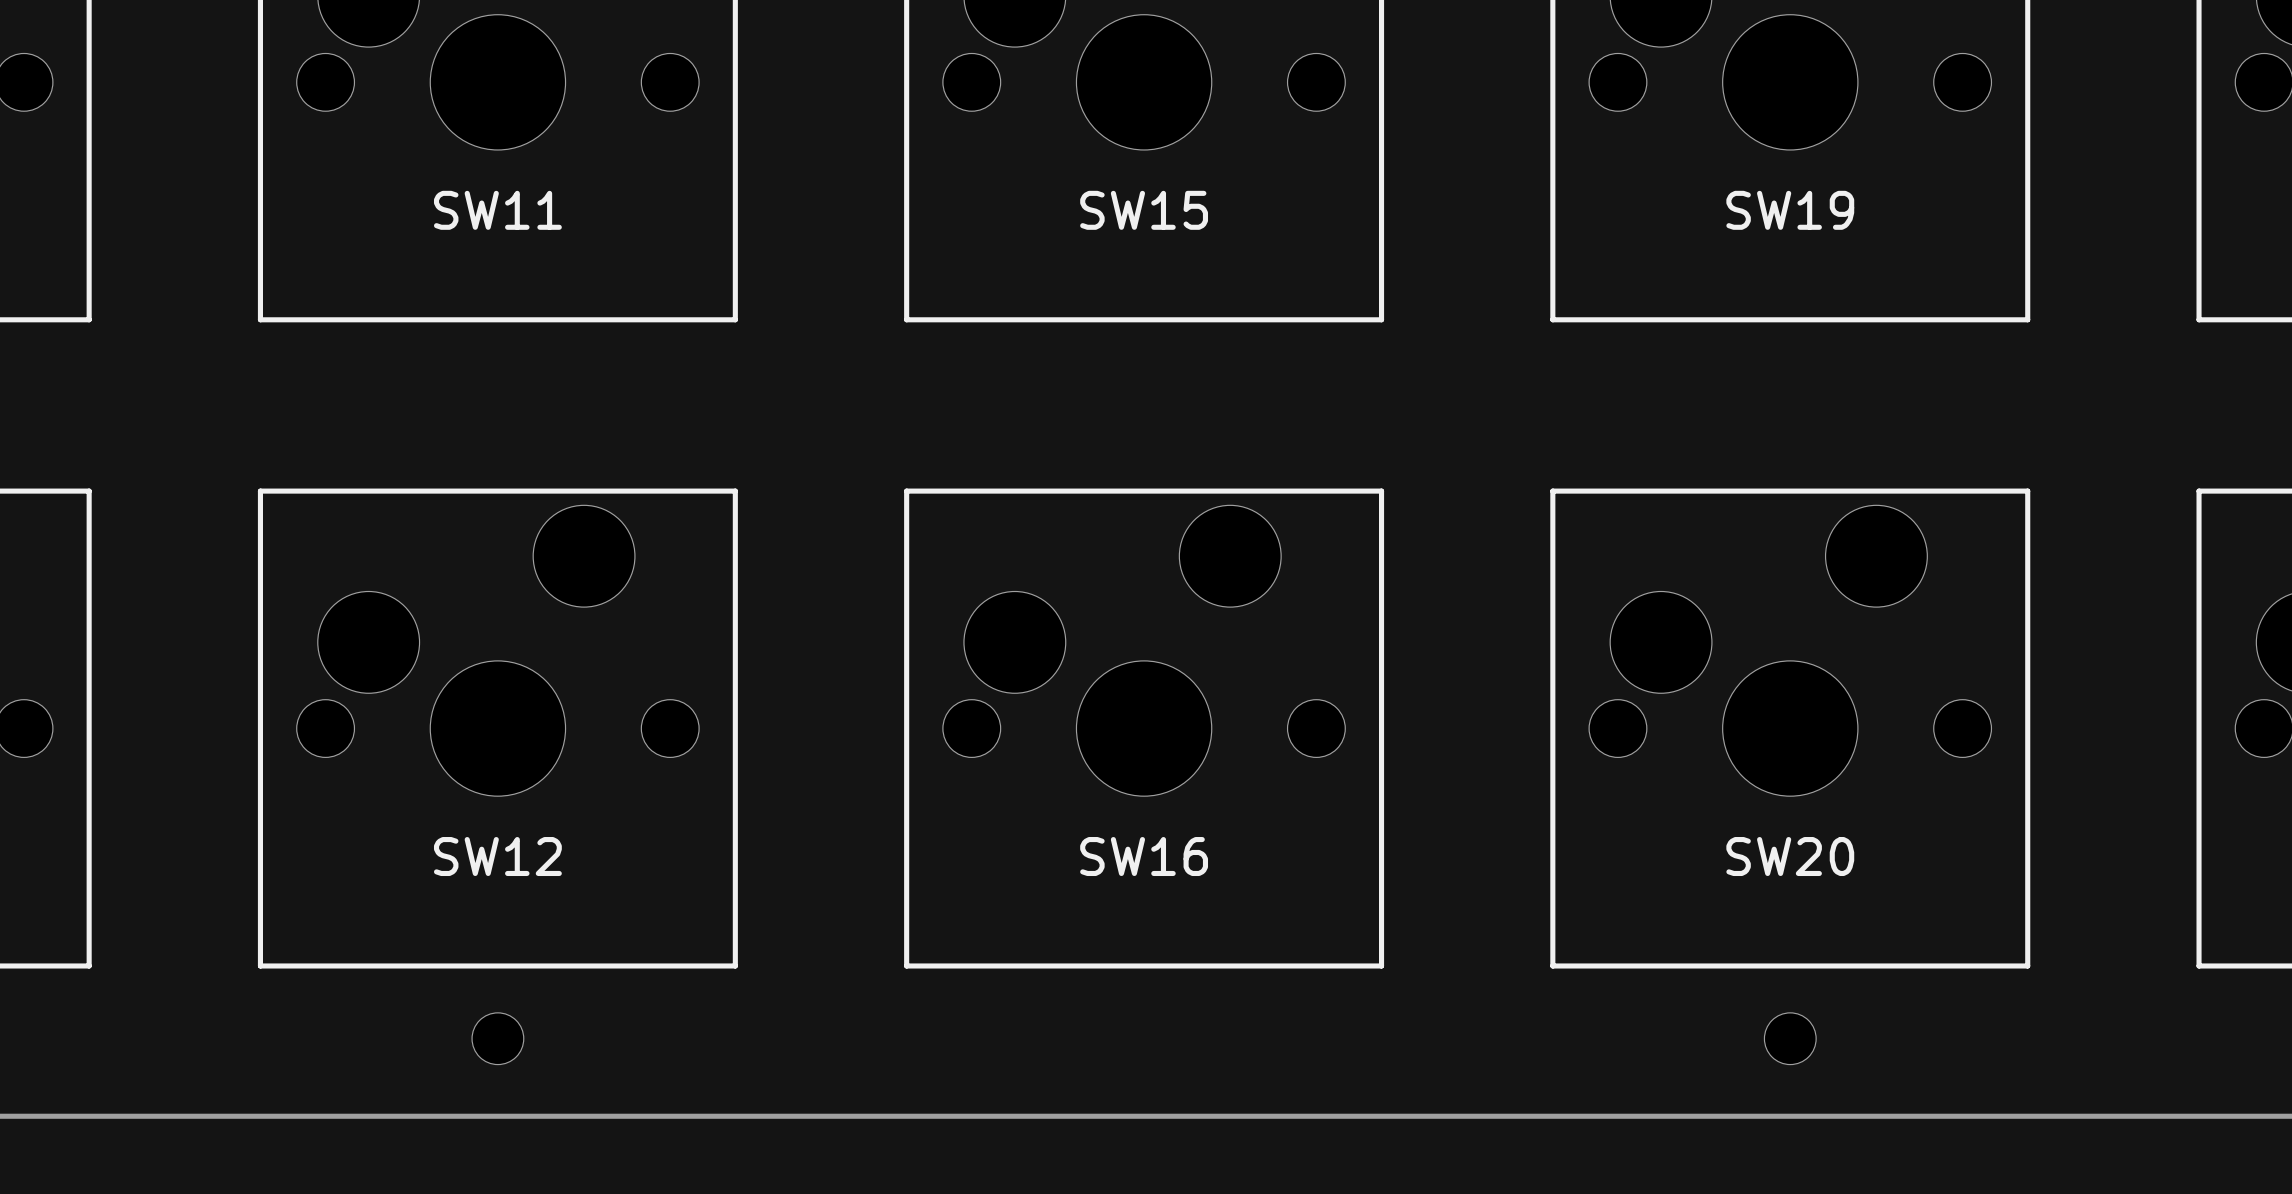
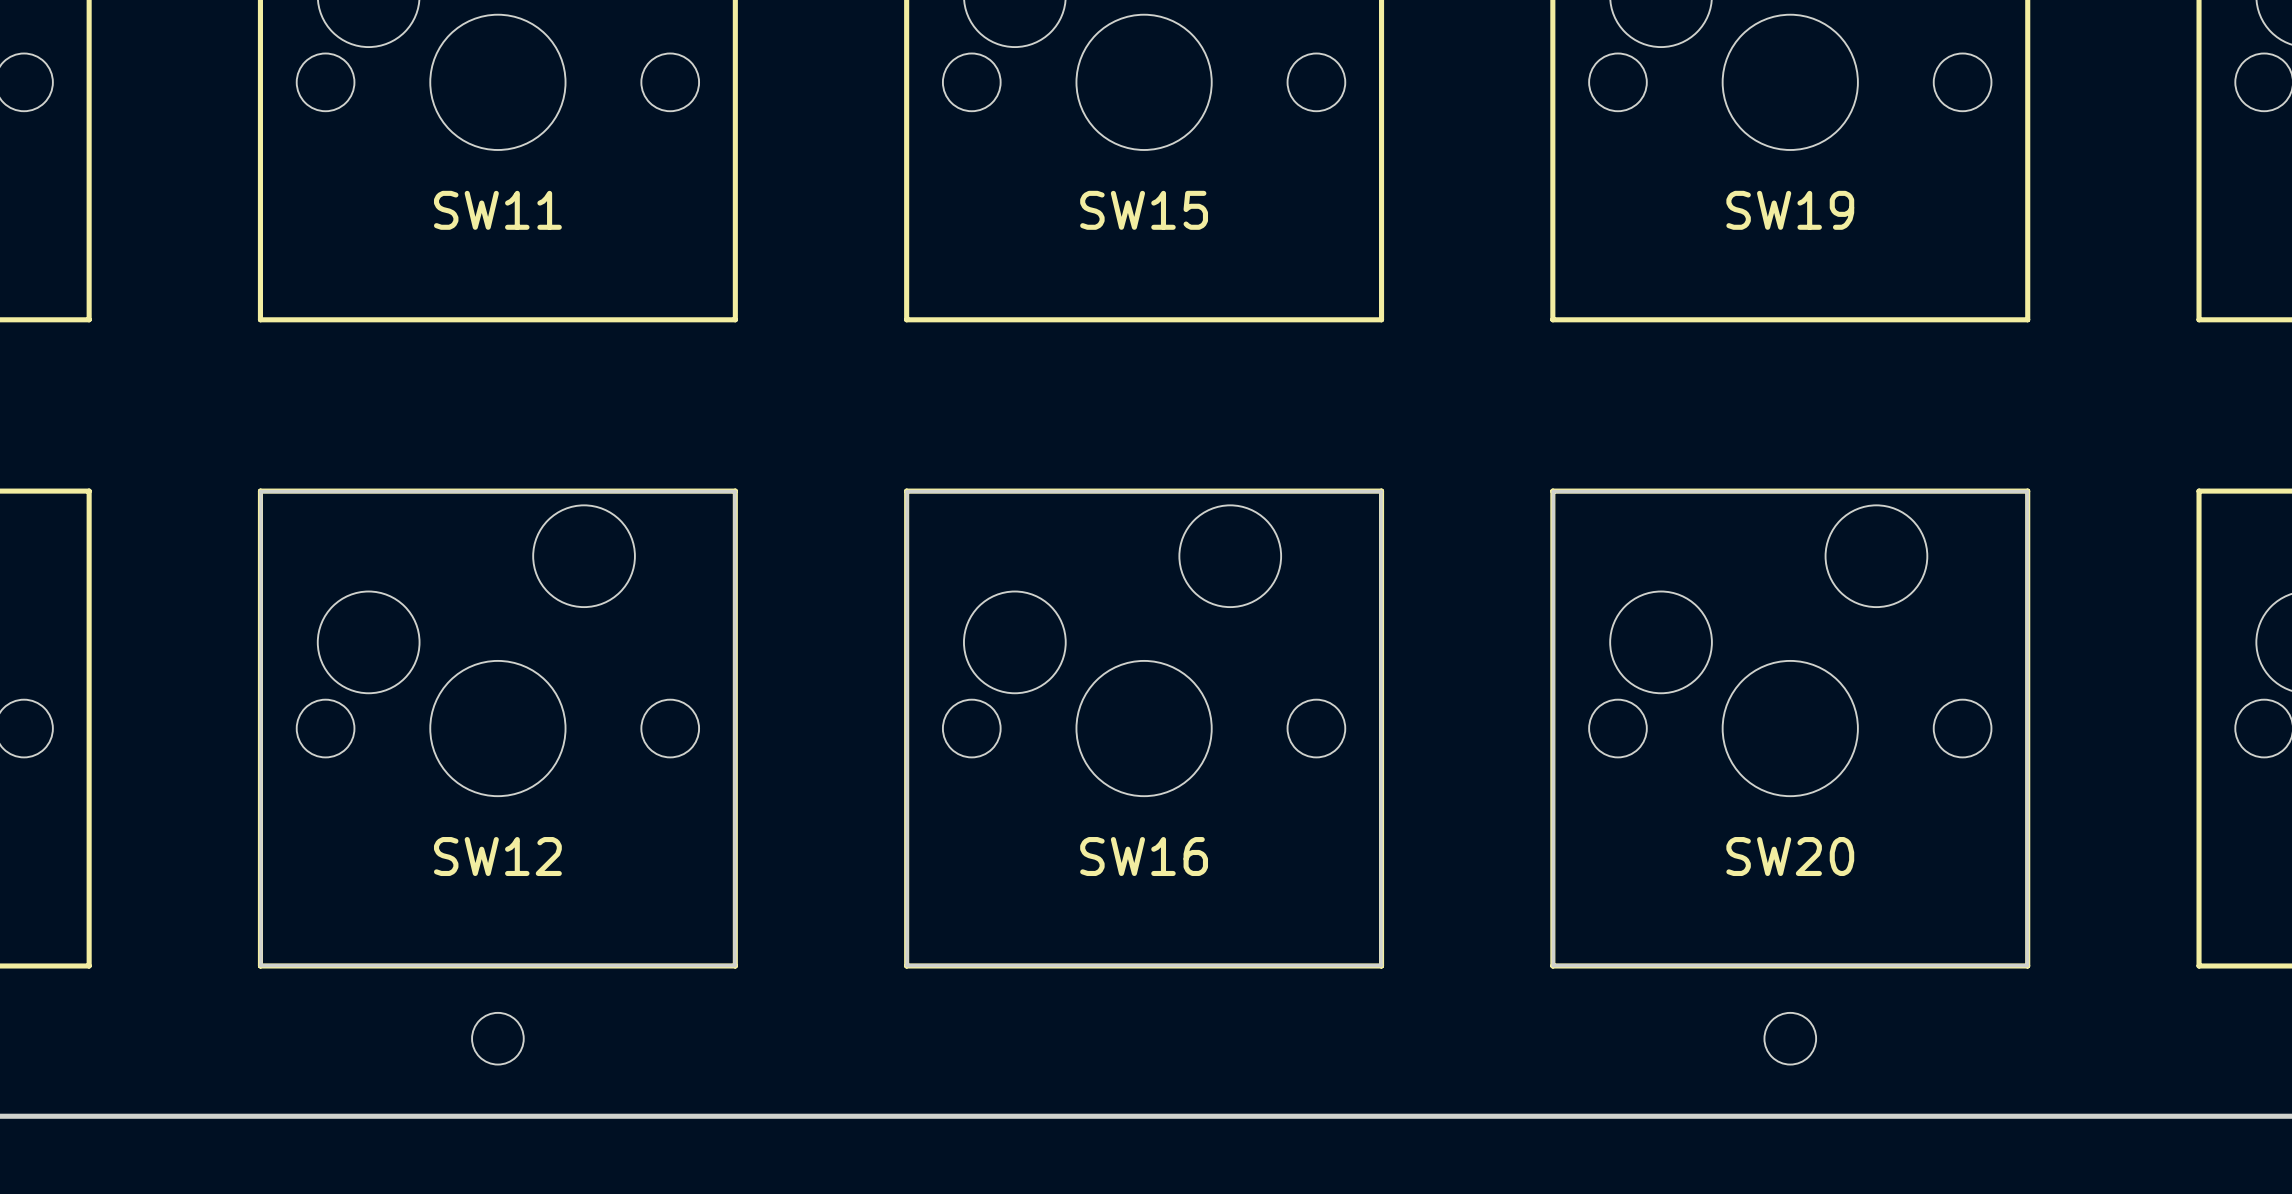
board edge: none -> (260, 491) (734, 491) (734, 965) (260, 965) (260, 491)
board edge: none -> (907, 491) (1381, 491) (1381, 965) (907, 965) (907, 491)
board edge: none -> (1553, 491) (2027, 491) (2027, 965) (1553, 965) (1553, 491)

